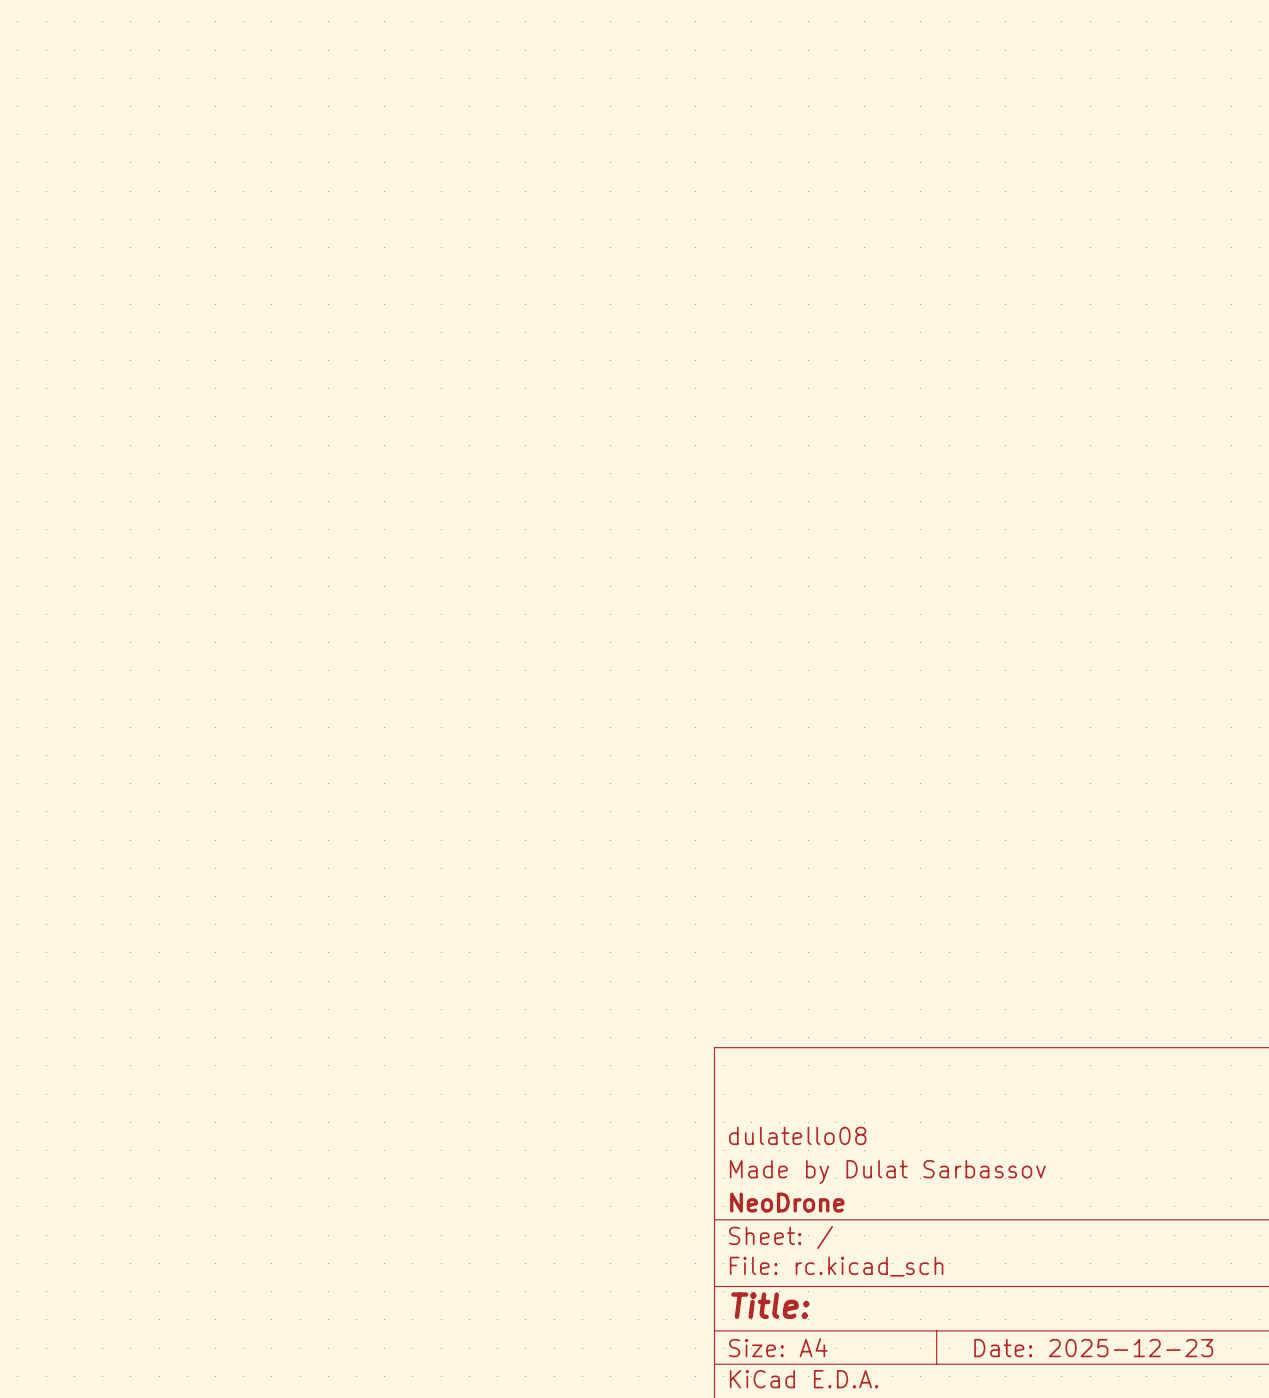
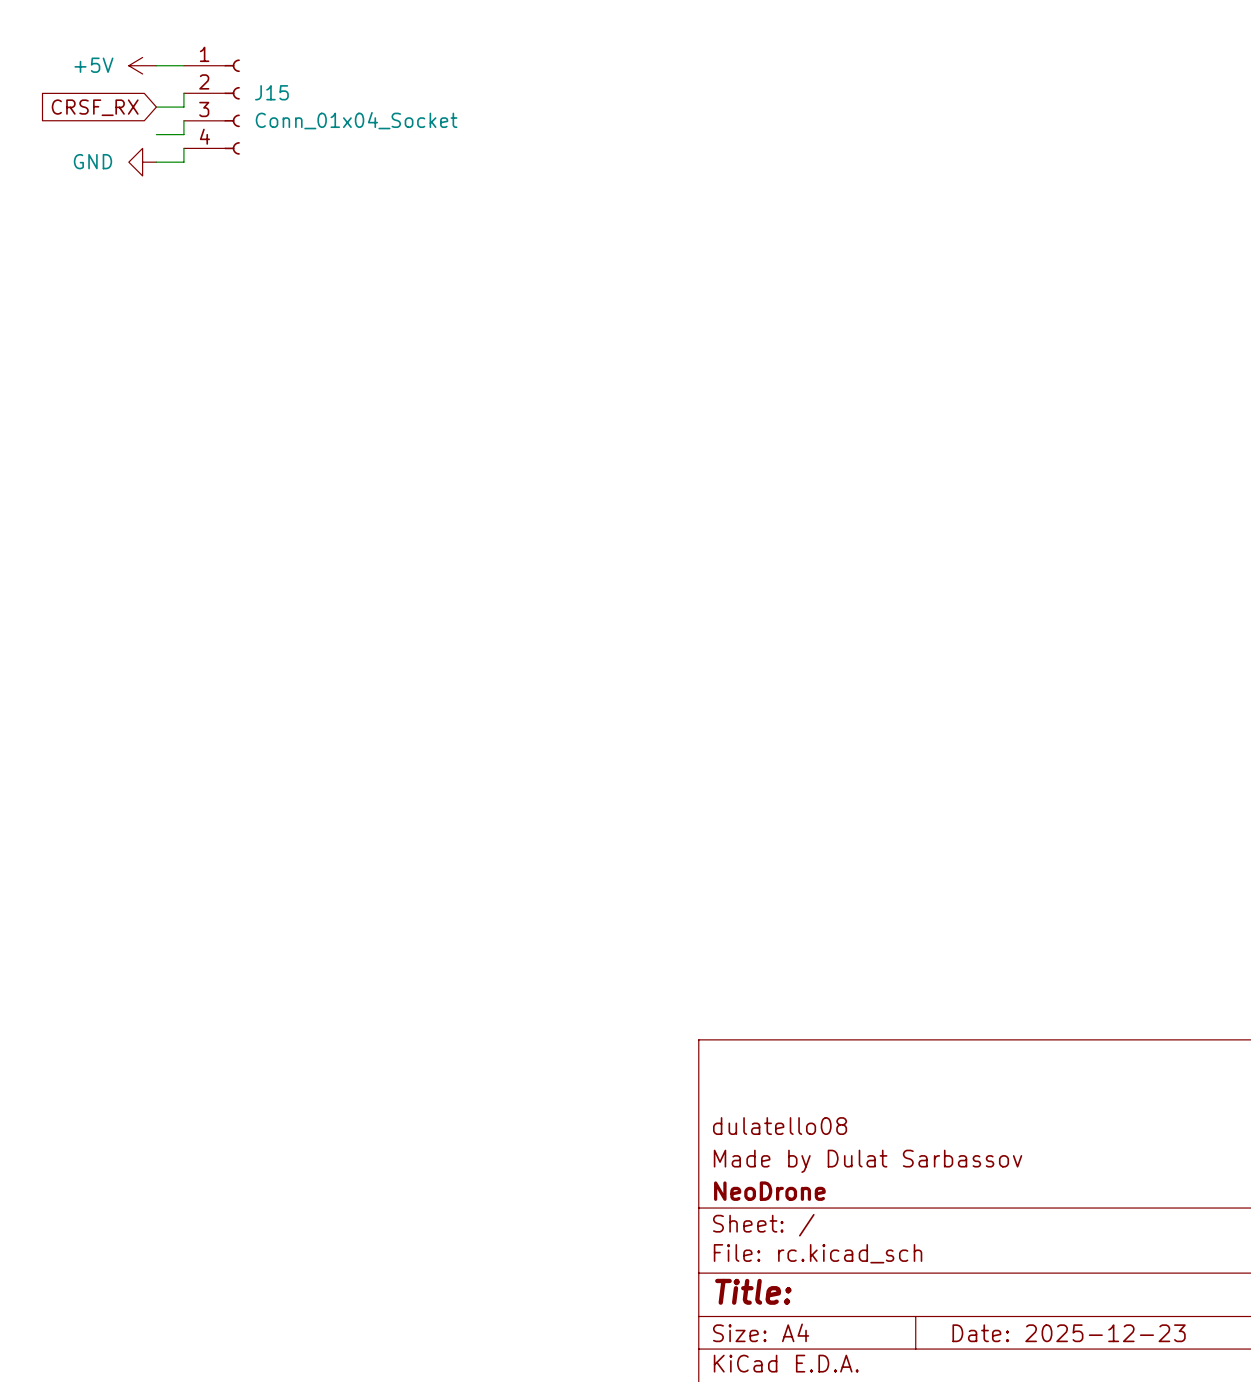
power symbol: none -> +5V (142, 65)
wire: none -> (156, 65) (183, 65)
wire: none -> (183, 93) (183, 107) (156, 107)
J15: none -> Conn_01x04_Socket (211, 107)
global label: none -> CRSF_RX (95, 107)
wire: none -> (183, 120) (183, 134) (156, 134)
wire: none -> (183, 148) (183, 162) (156, 162)
power symbol: none -> GND (142, 162)

